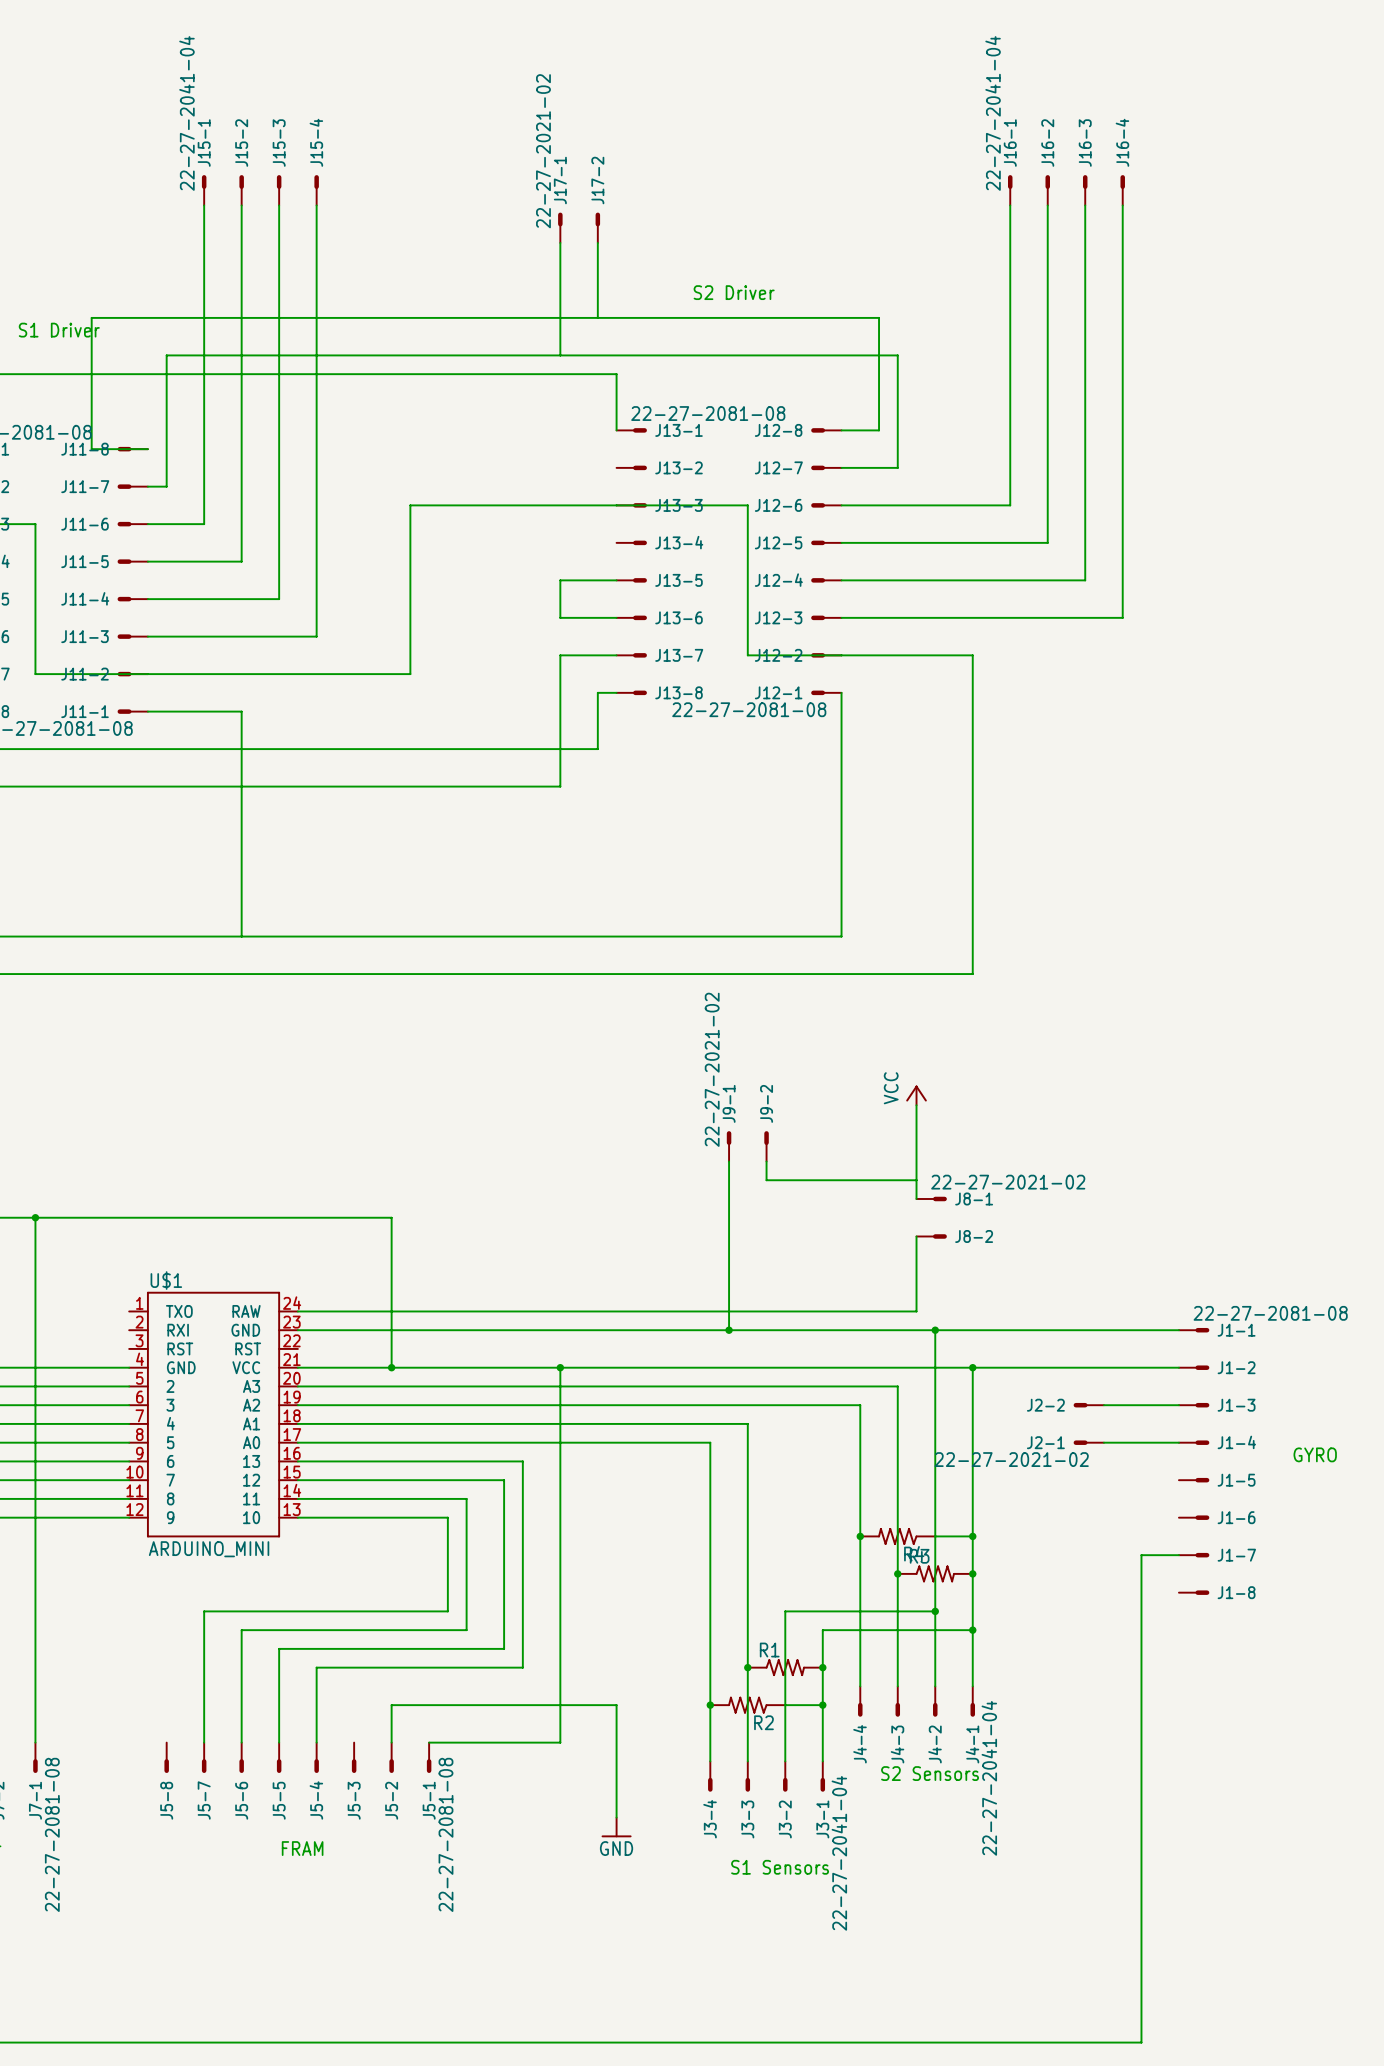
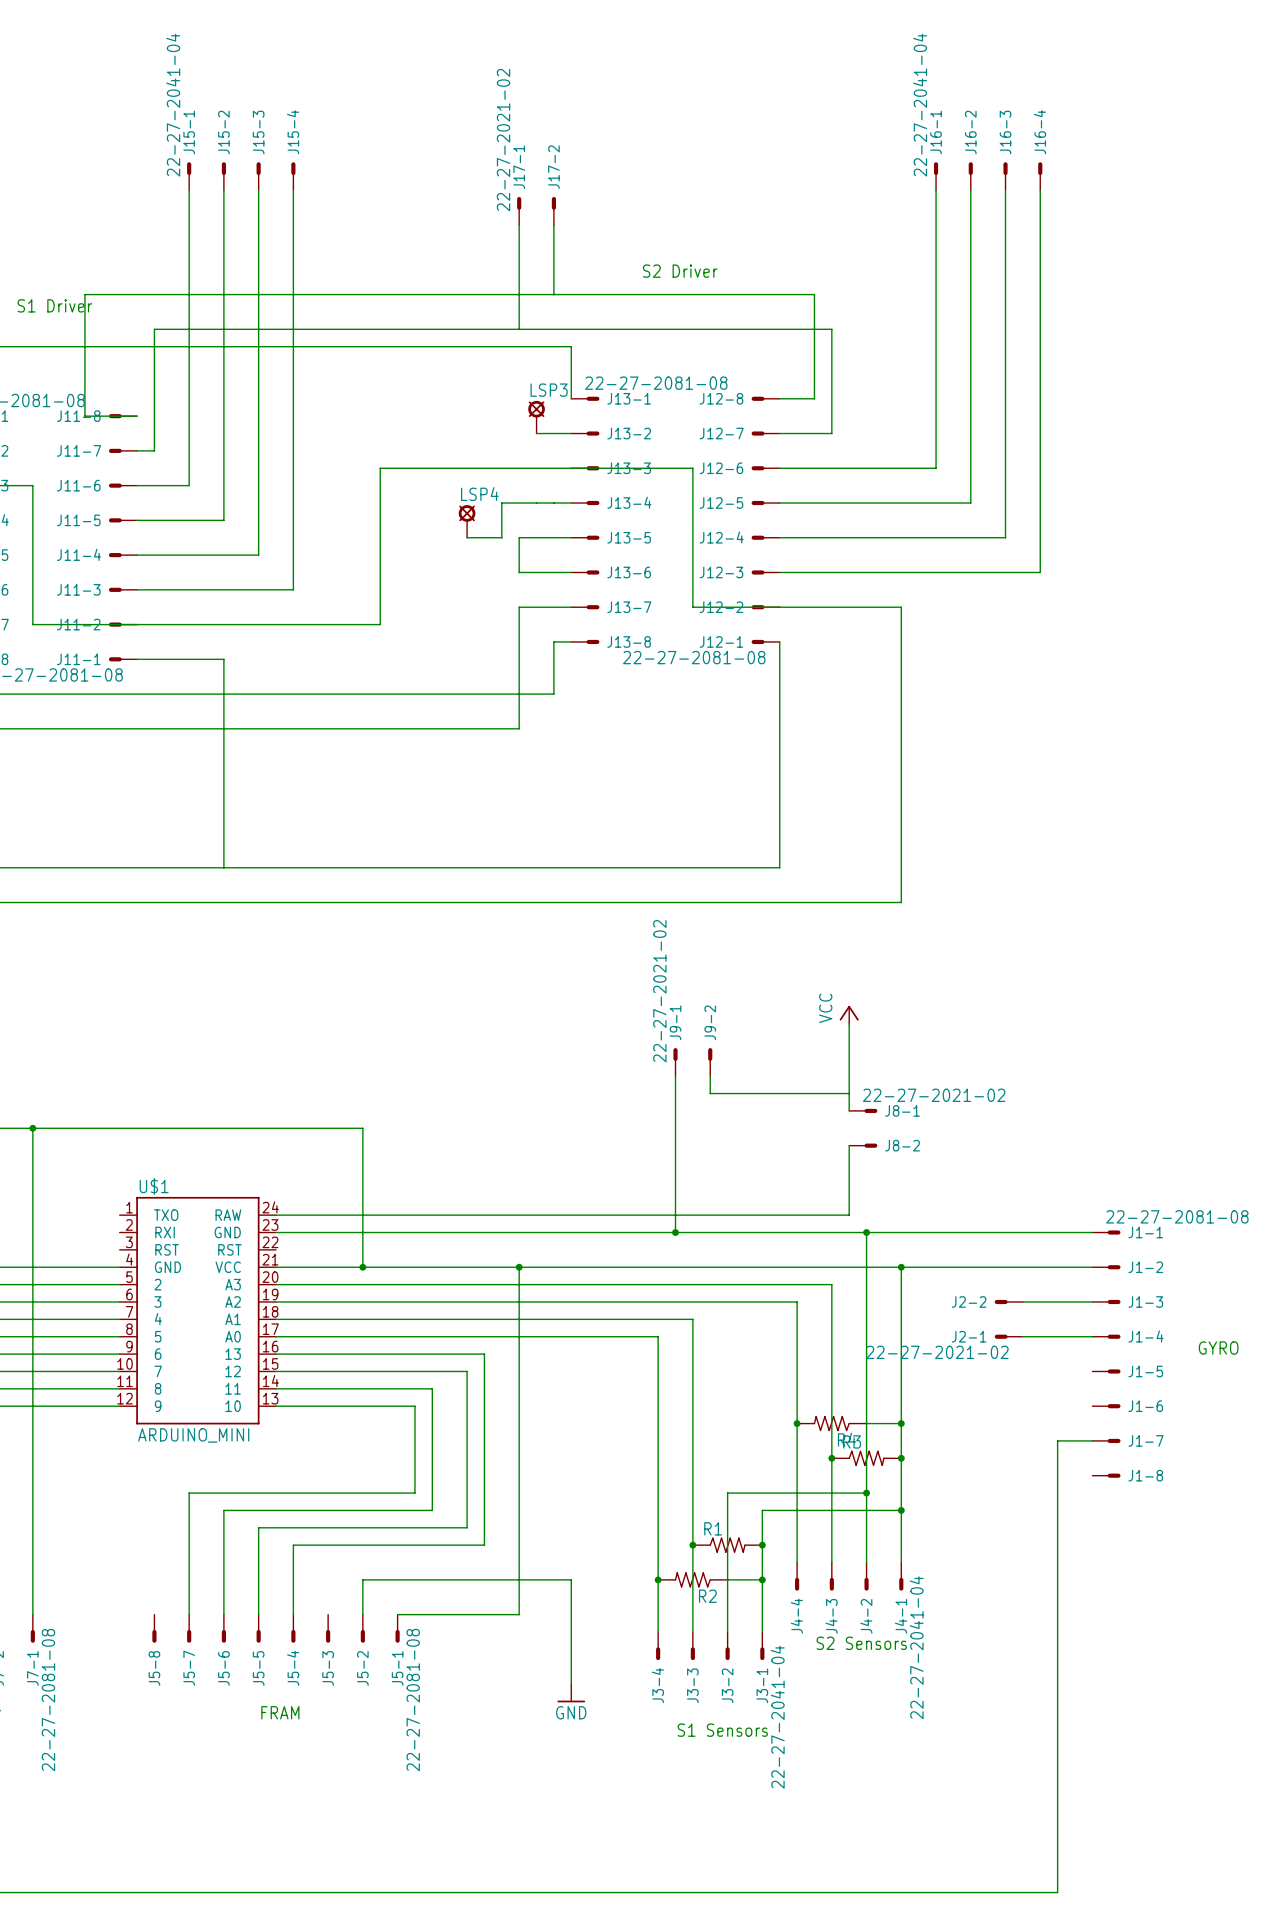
LSP3: none -> (536, 417)
wire: none -> (536, 433) (571, 433)
wire: none -> (571, 503) (501, 503) (501, 537) (467, 537)
LSP4: none -> (467, 521)

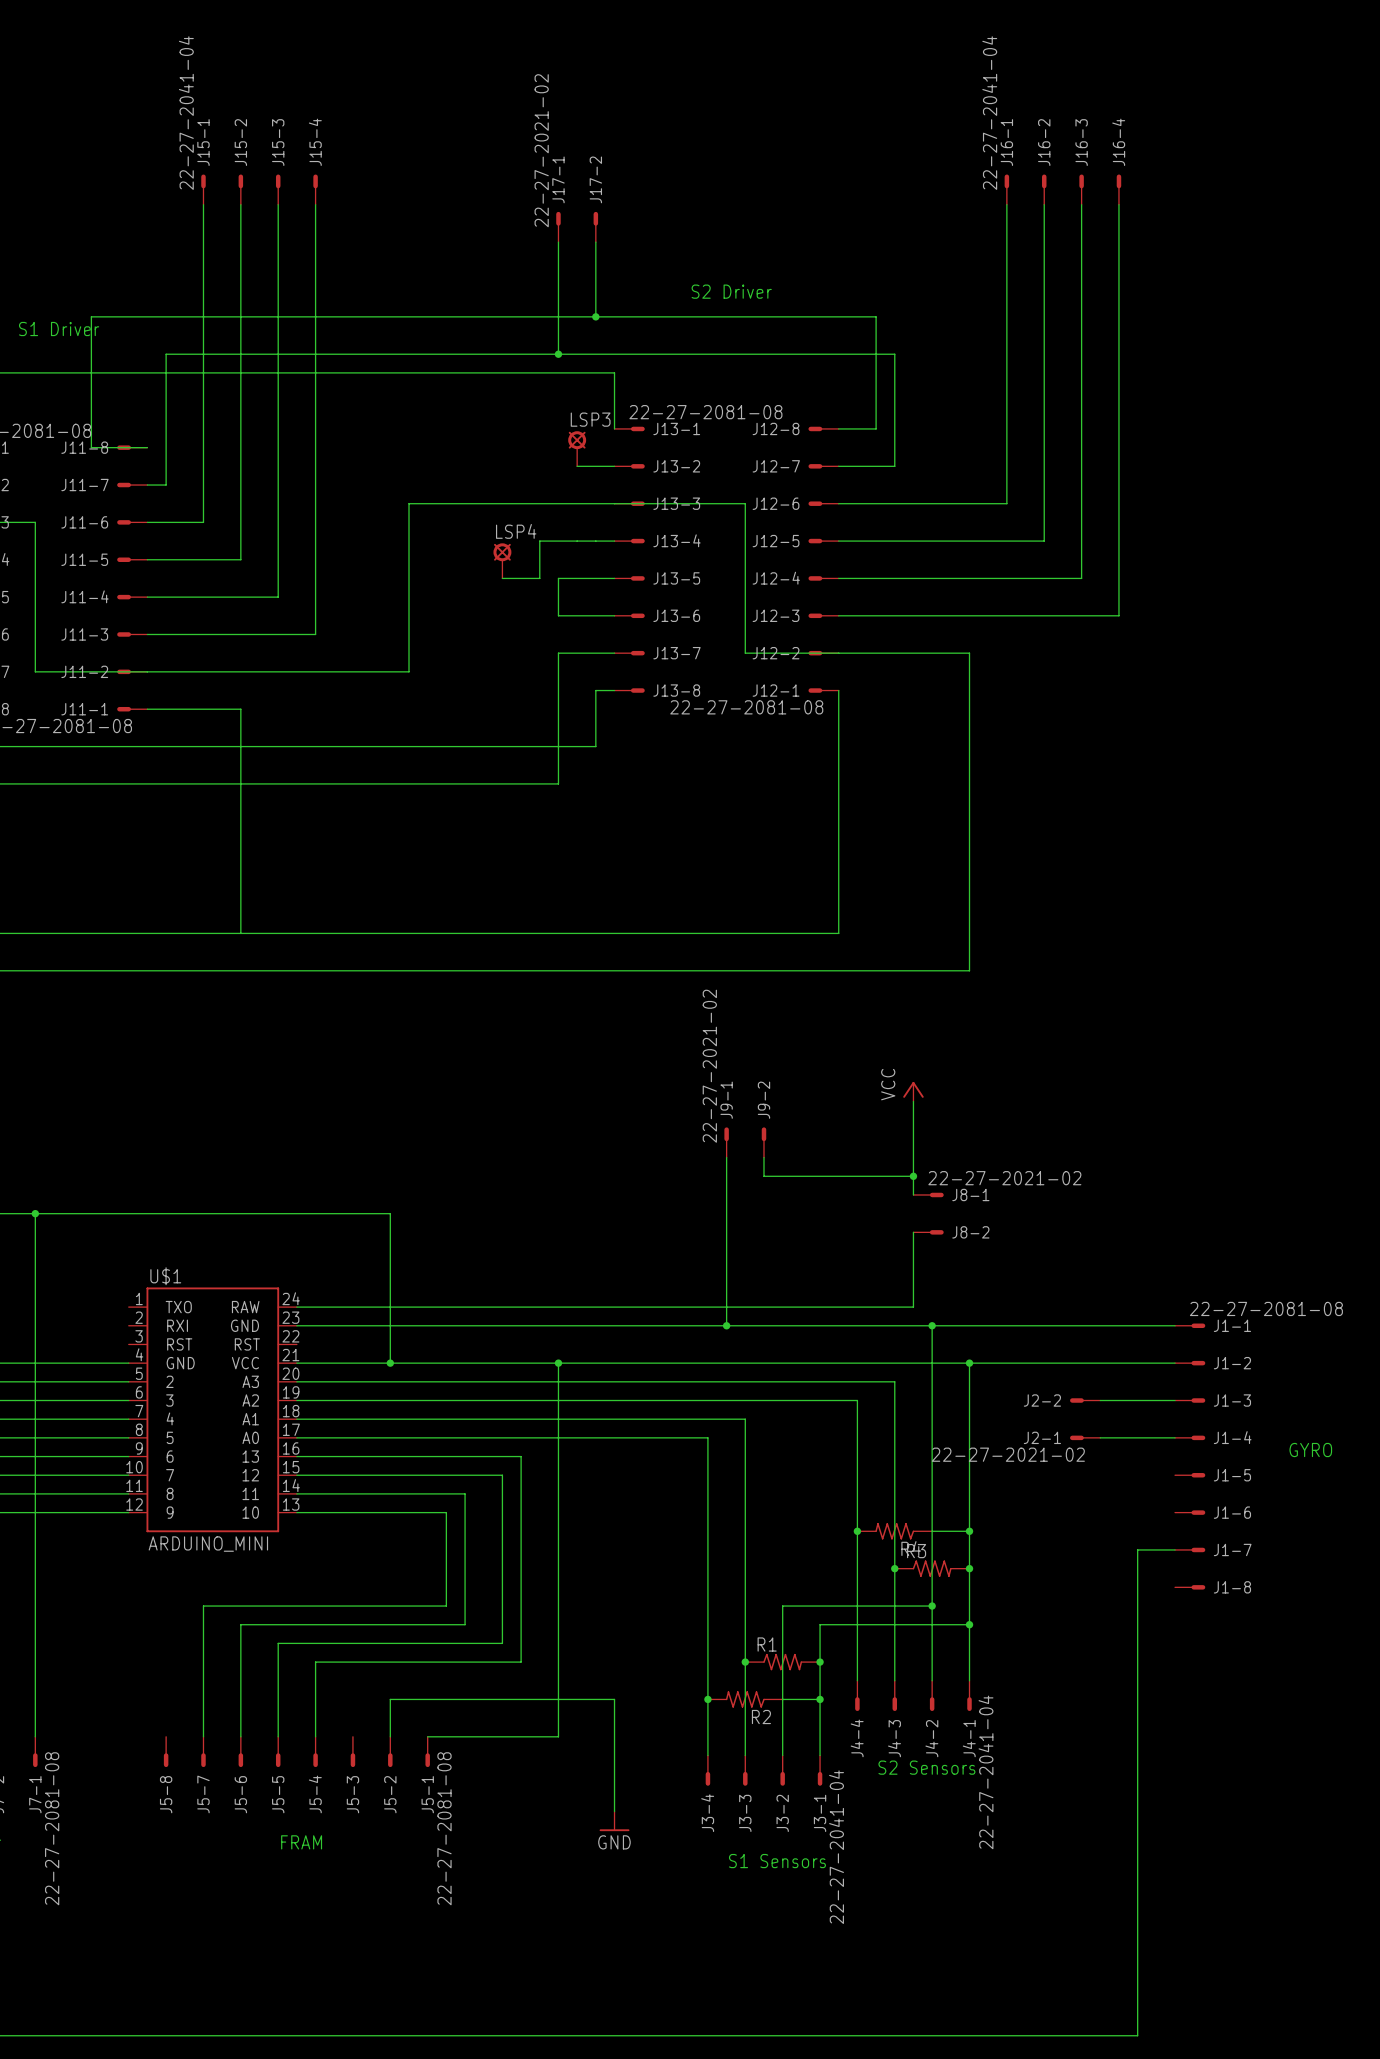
junction: none -> (595, 316)
junction: none -> (558, 354)
junction: none -> (913, 1176)

